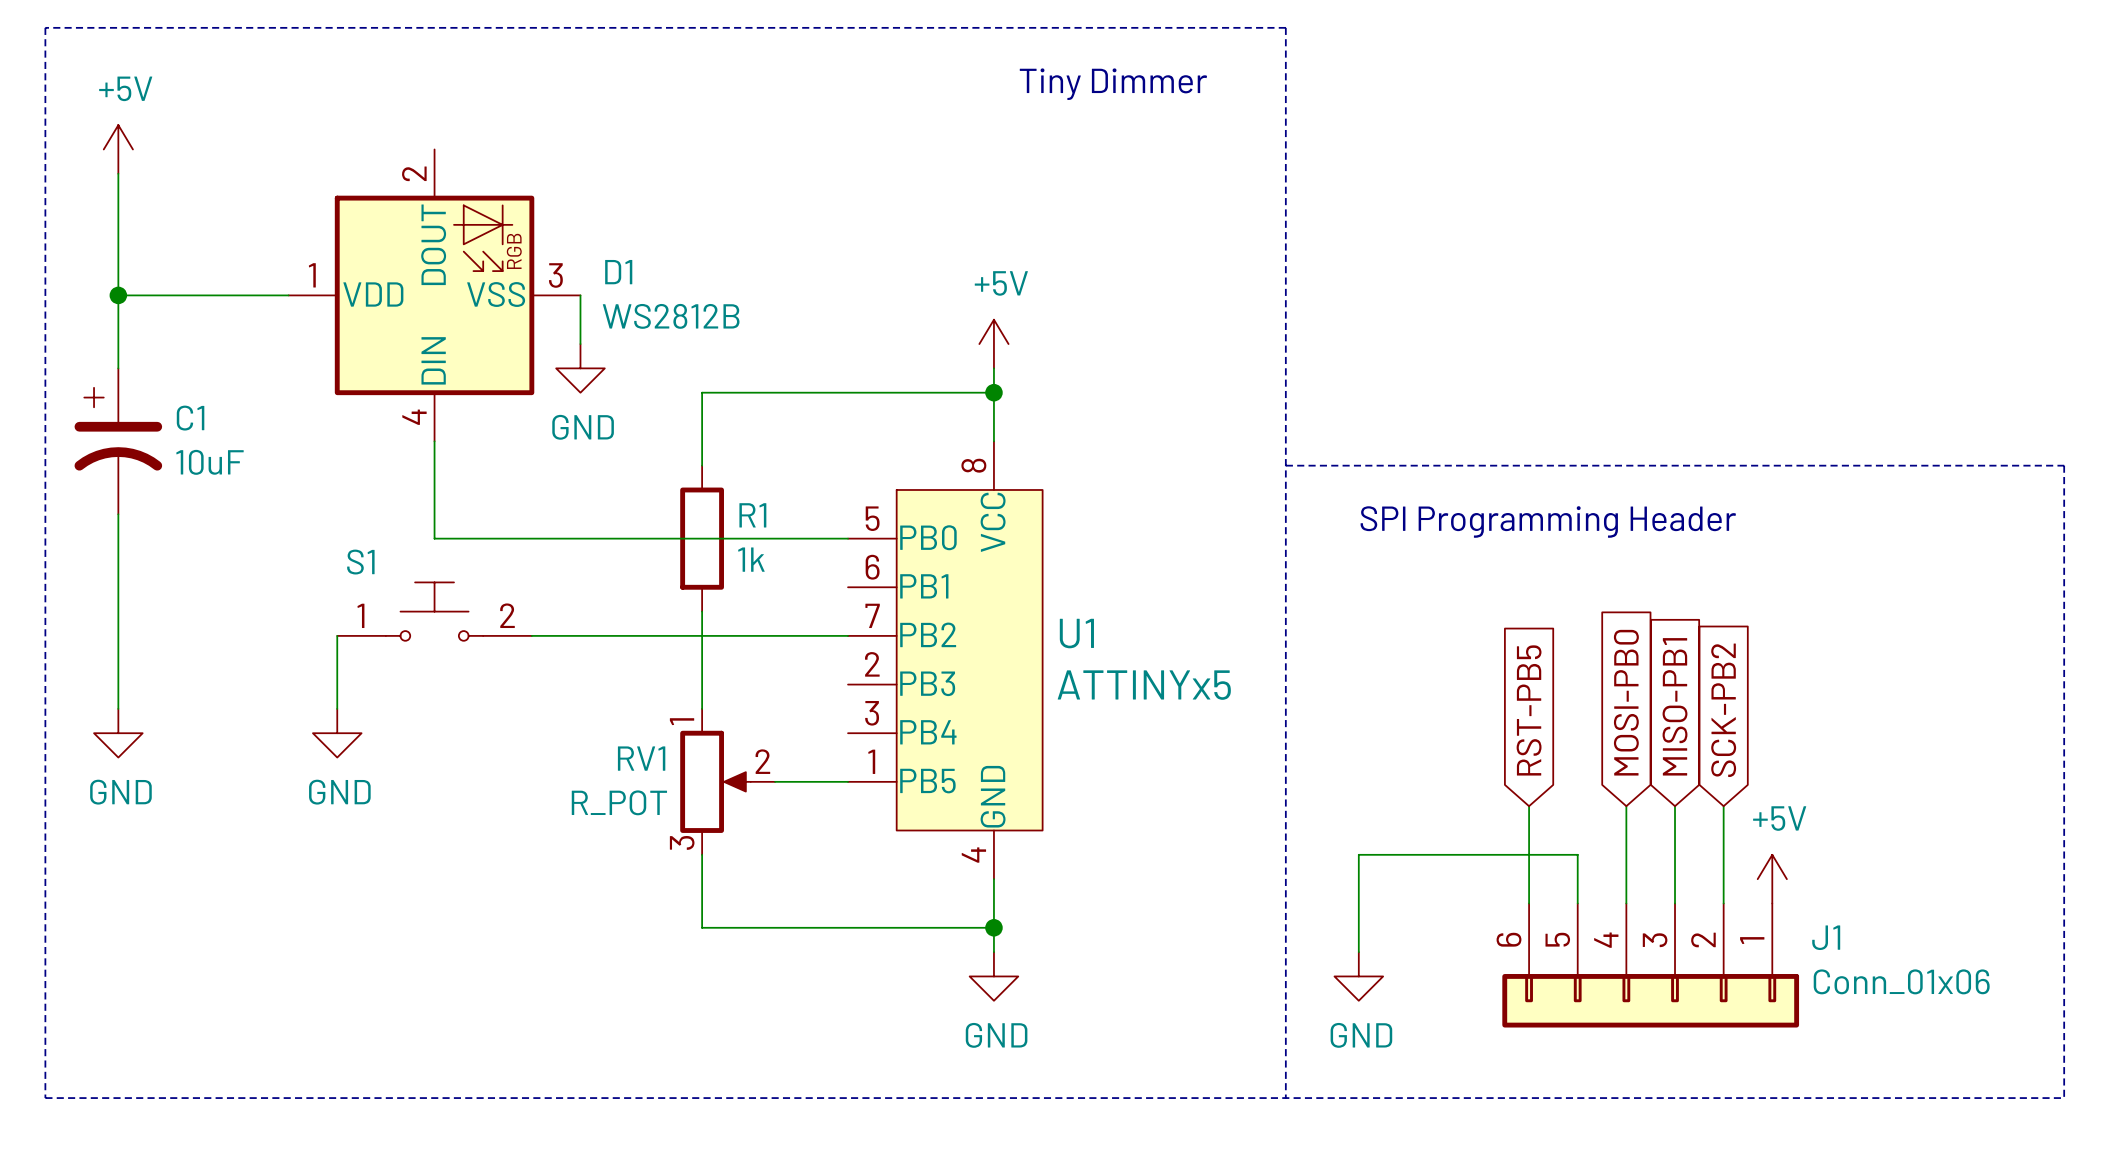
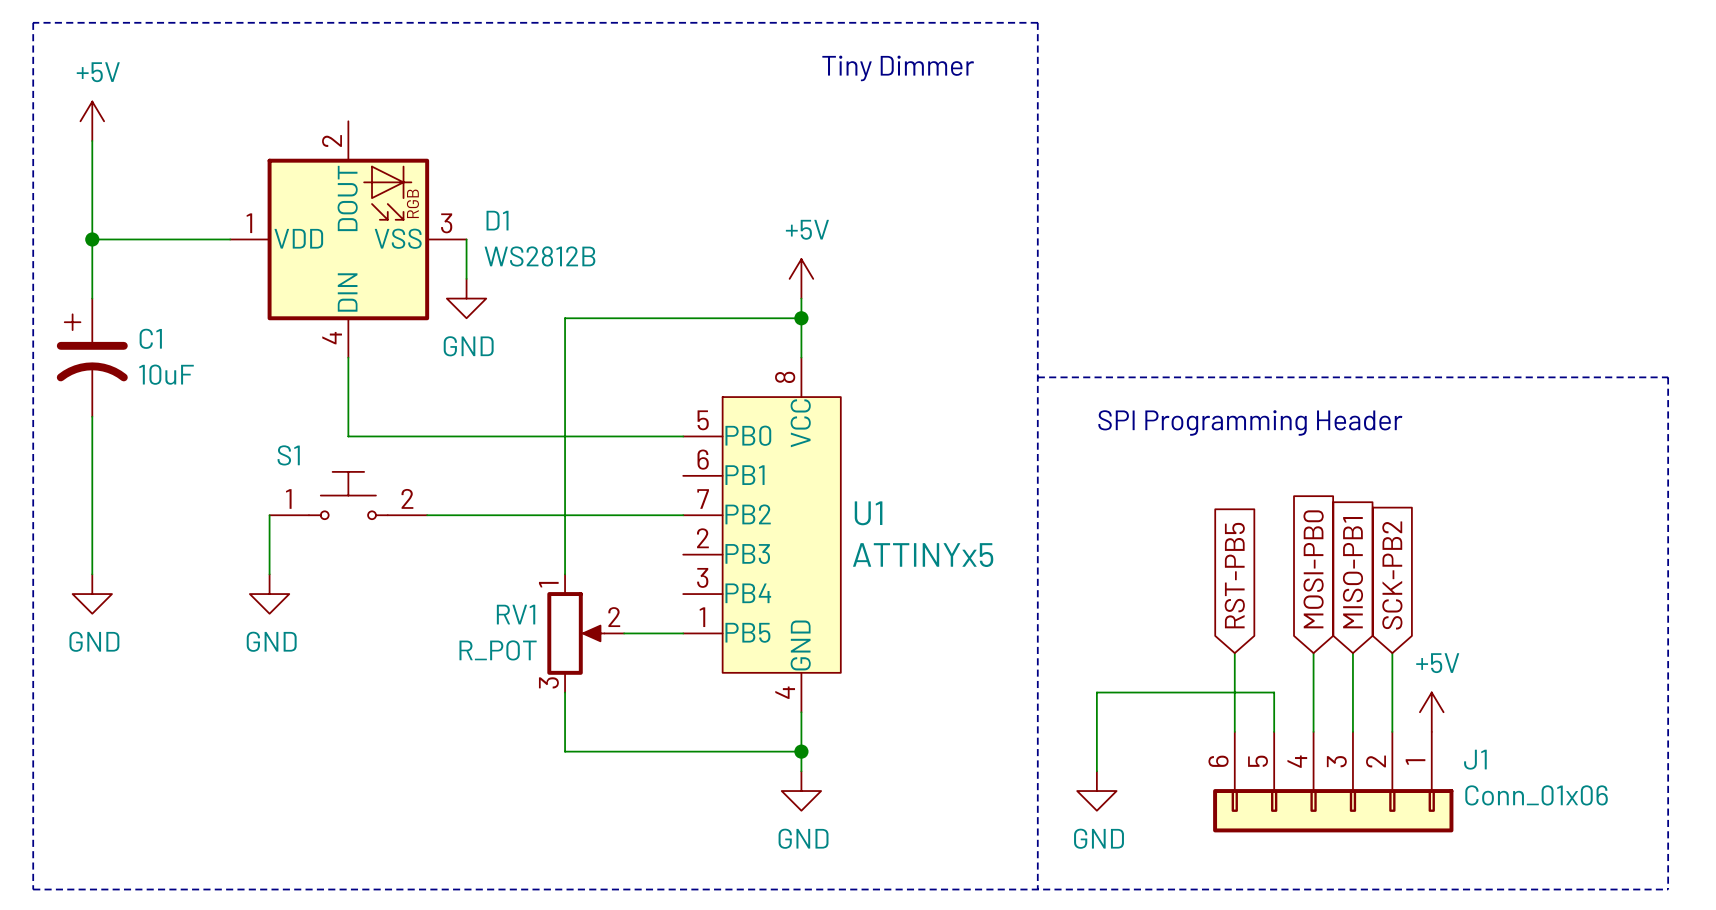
wire: none -> (565, 377) (565, 495)
R1: 1k (702, 538) -> none

